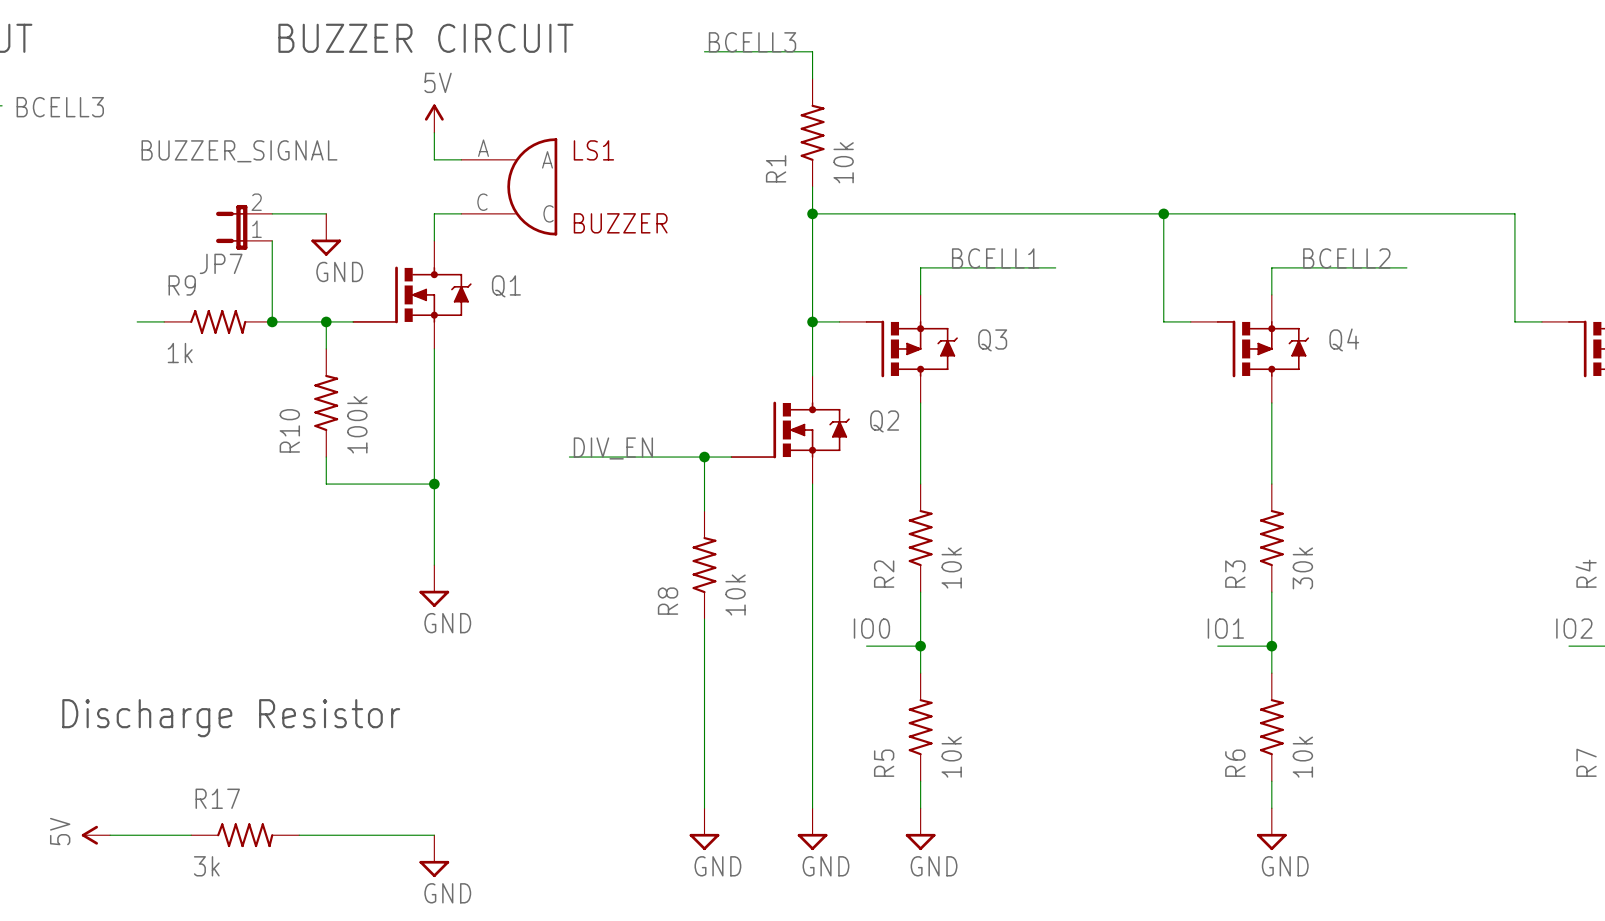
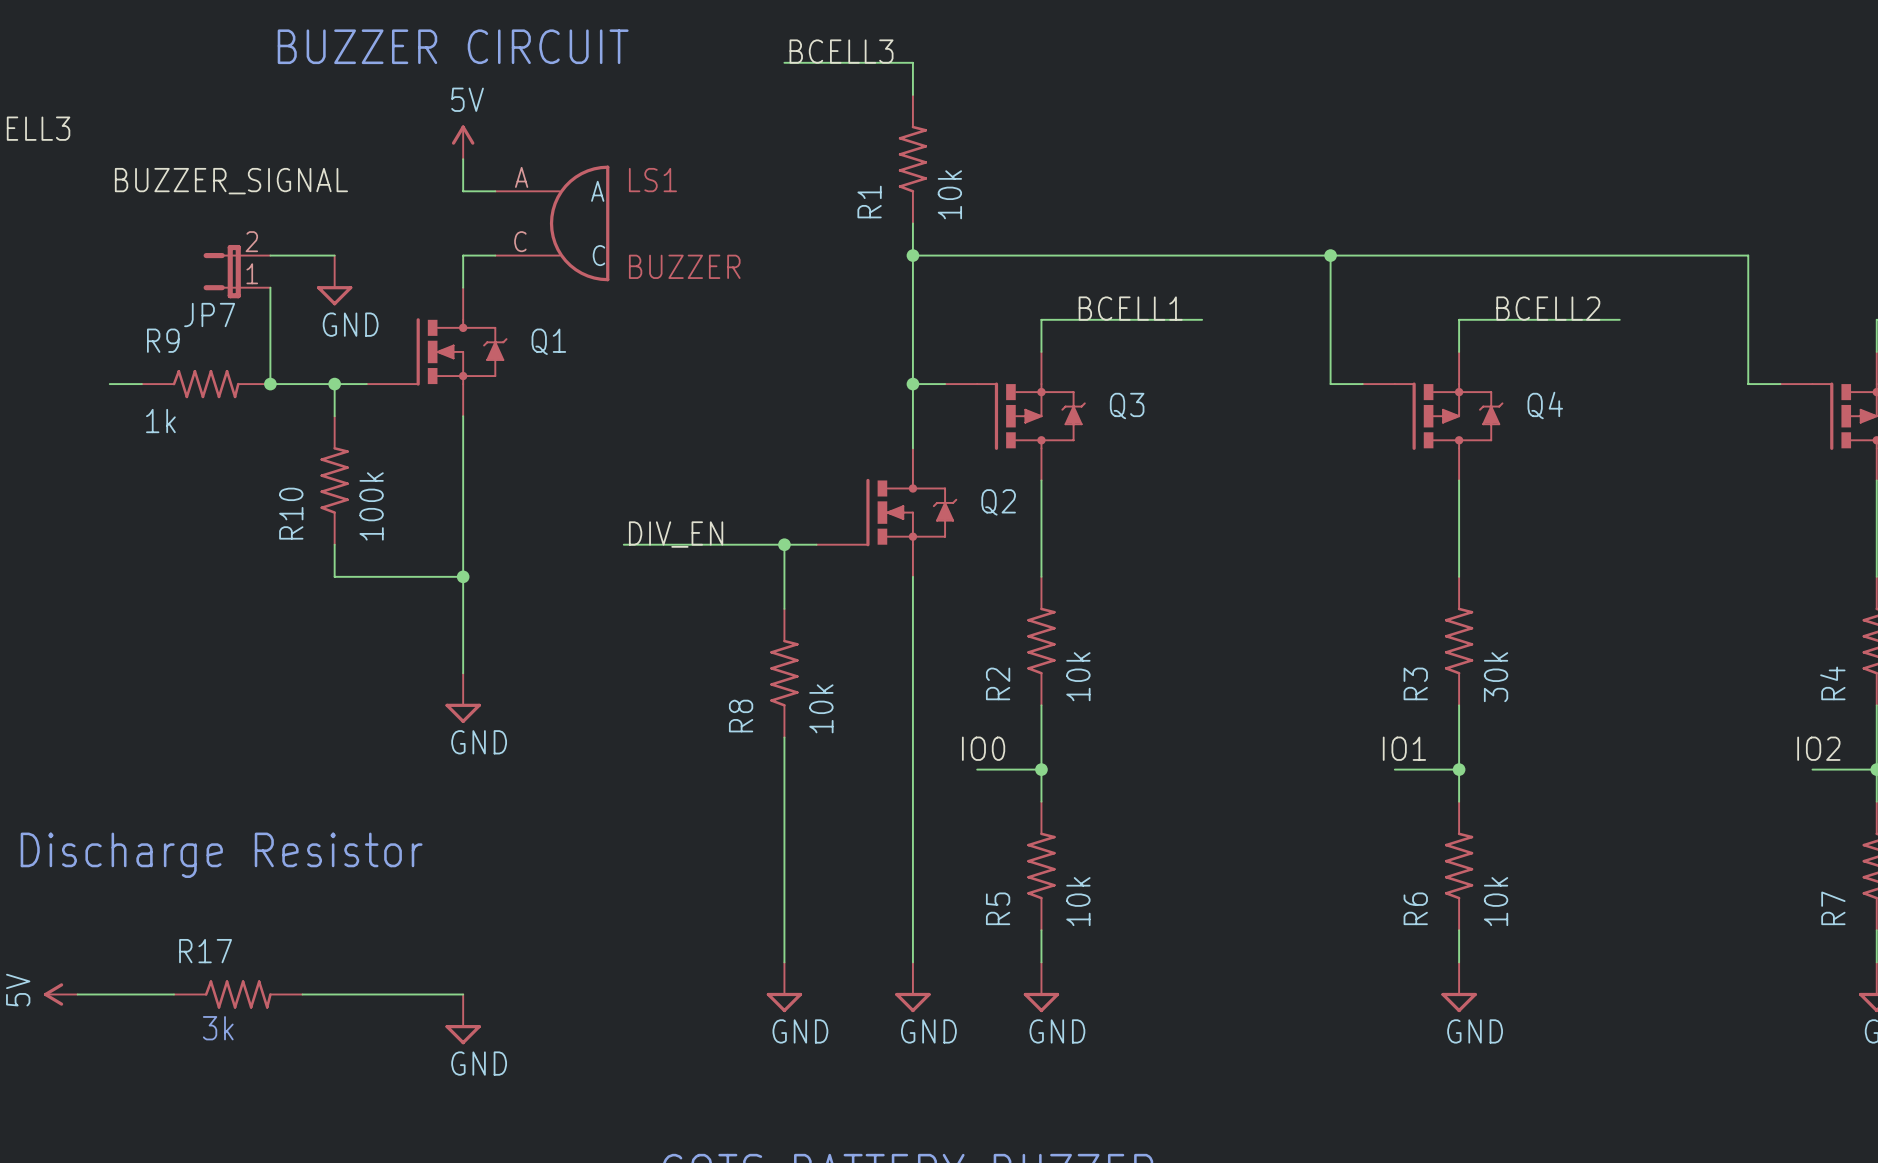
text: none -> 3k (218, 1028)
R17 value: 3k (206, 866) -> none

